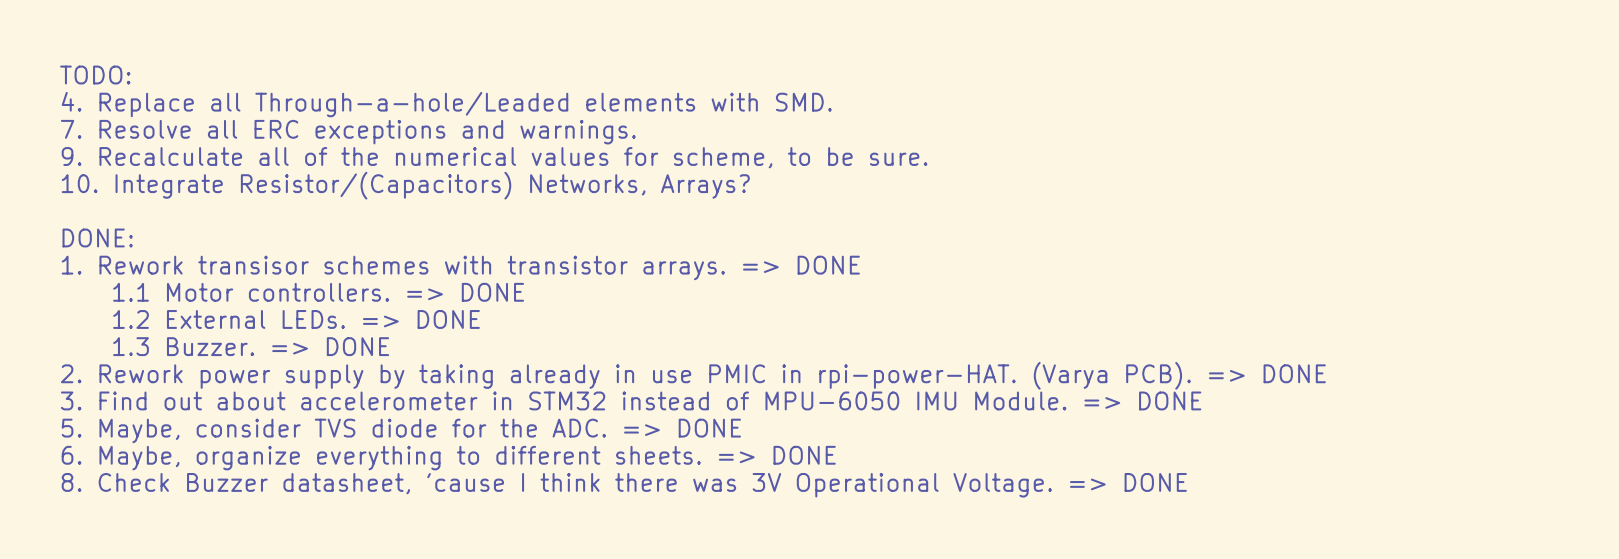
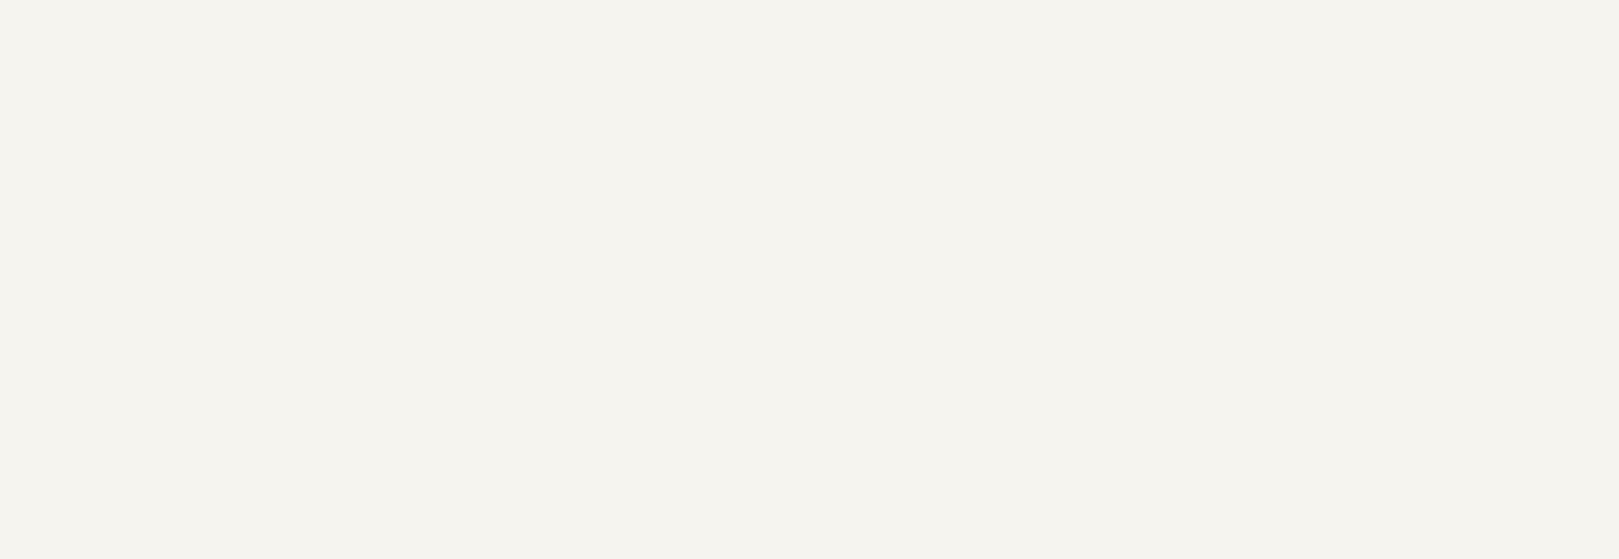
text: TODO: (95, 75) -> none
text: 4. Replace all Through-a-hole/Leaded elements with SMD. (446, 104) -> none
text: 7. Resolve all ERC exceptions and warnings. (348, 132) -> none
text: 9. Recalculate all of the numerical values for scheme, to be sure. (494, 157) -> none
text: 10. Integrate Resistor/(Capacitors) Networks, Arrays? (405, 185) -> none
text: DONE: (97, 237) -> none
text: 1. Rework transisor schemes with transistor arrays. => DONE (460, 267) -> none
text: 1.1 Motor controllers. => DONE (318, 292) -> none
text: 1.2 External LEDs. => DONE (296, 319) -> none
text: 1.3 Buzzer. => DONE (251, 346) -> none
text: 2. Rework power supply by taking already in use PMIC in rpi-power-HAT. (Varya PCB). => DONE (693, 375) -> none
text: 3. Find out about accelerometer in STM32 instead of MPU-6050 IMU Module. => DONE (631, 400) -> none
text: 5. Maybe, consider TVS diode for the ADC. => DONE (401, 430) -> none
text: 6. Maybe, organize everything to different sheets. => DONE (448, 458) -> none
text: 8. Check Buzzer datasheet, 'cause I think there was 3V Operational Voltage. => DONE (624, 485) -> none

